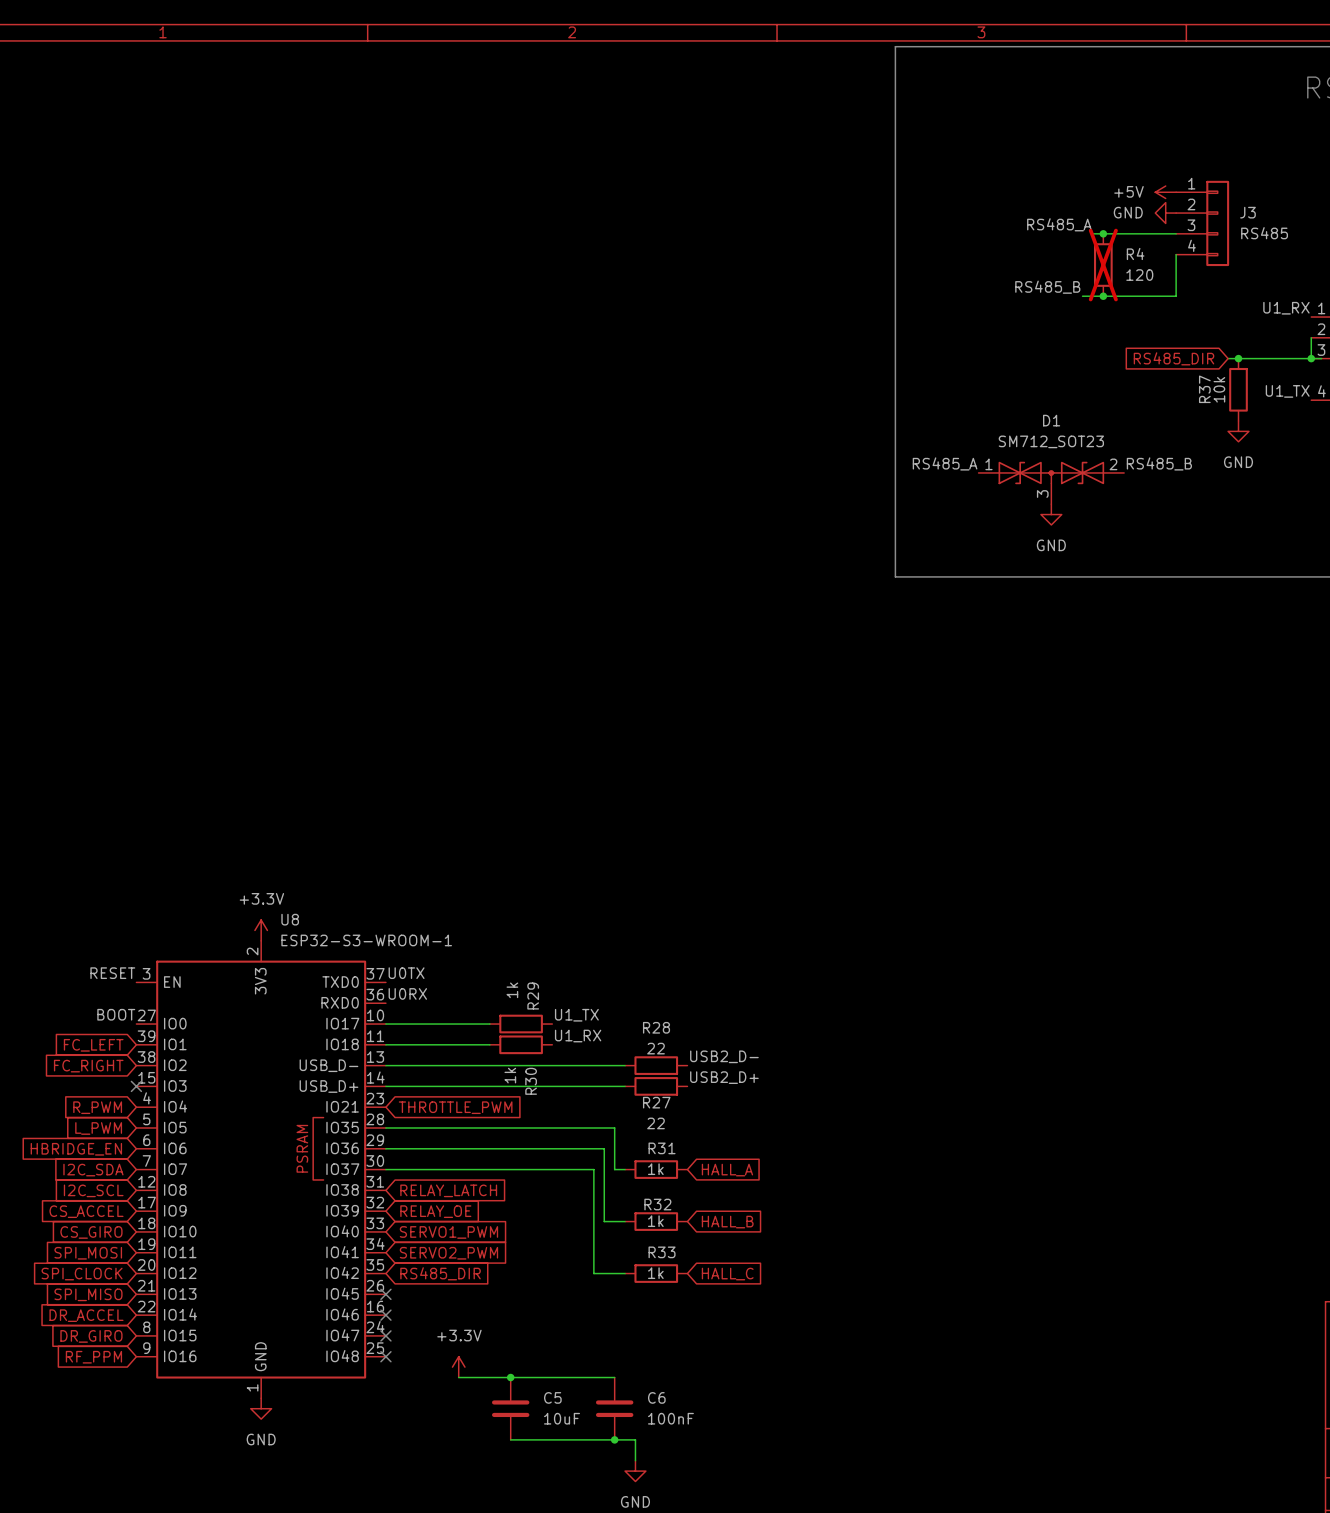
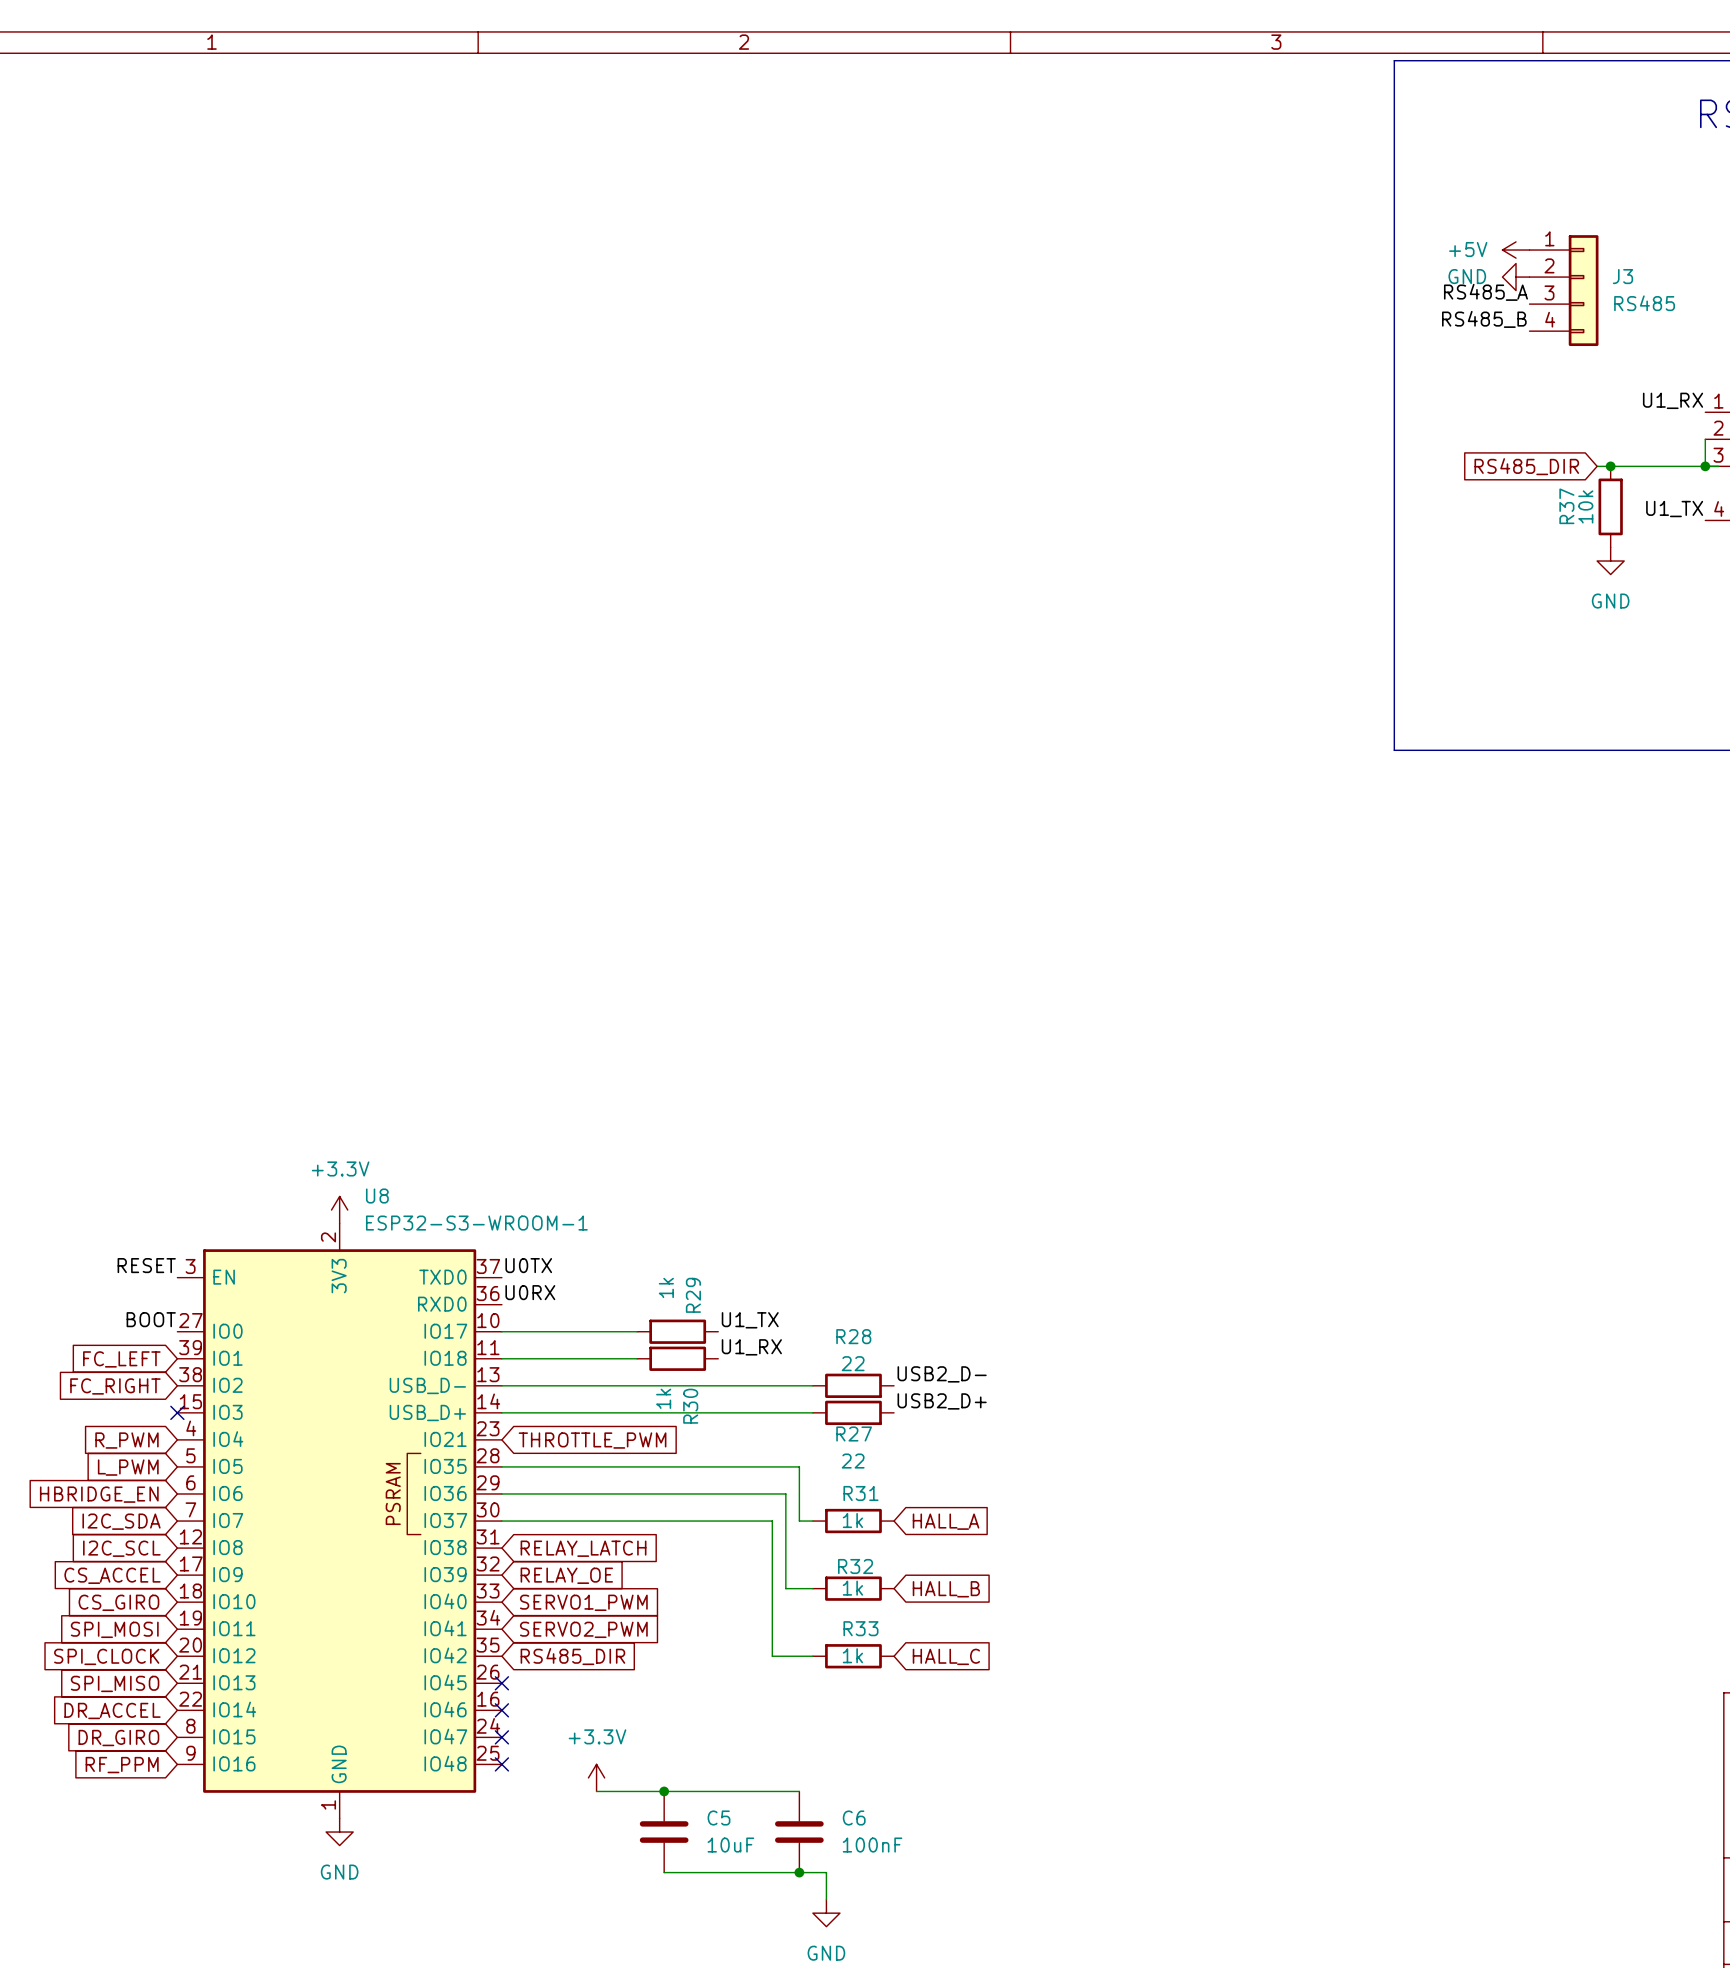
line: (1072, 46) (895, 46) (895, 576) (1072, 576) -> (1394, 60) (1394, 750)
label position: RS485_A (1059, 224) -> RS485_A (1485, 292)
wire: (1092, 233) (1176, 233) -> none
junction: (1103, 233) -> none
wire: (1176, 254) (1176, 296) (1082, 296) -> none
R4: 120 (1103, 265) -> none
label position: RS485_B (1047, 287) -> RS485_B (1484, 319)
junction: (1103, 296) -> none
label: RS485_A (945, 463) -> none
label: RS485_B (1159, 463) -> none
D1: SM712_SOT23 (1051, 482) -> none
power symbol: GND (1051, 514) -> none

